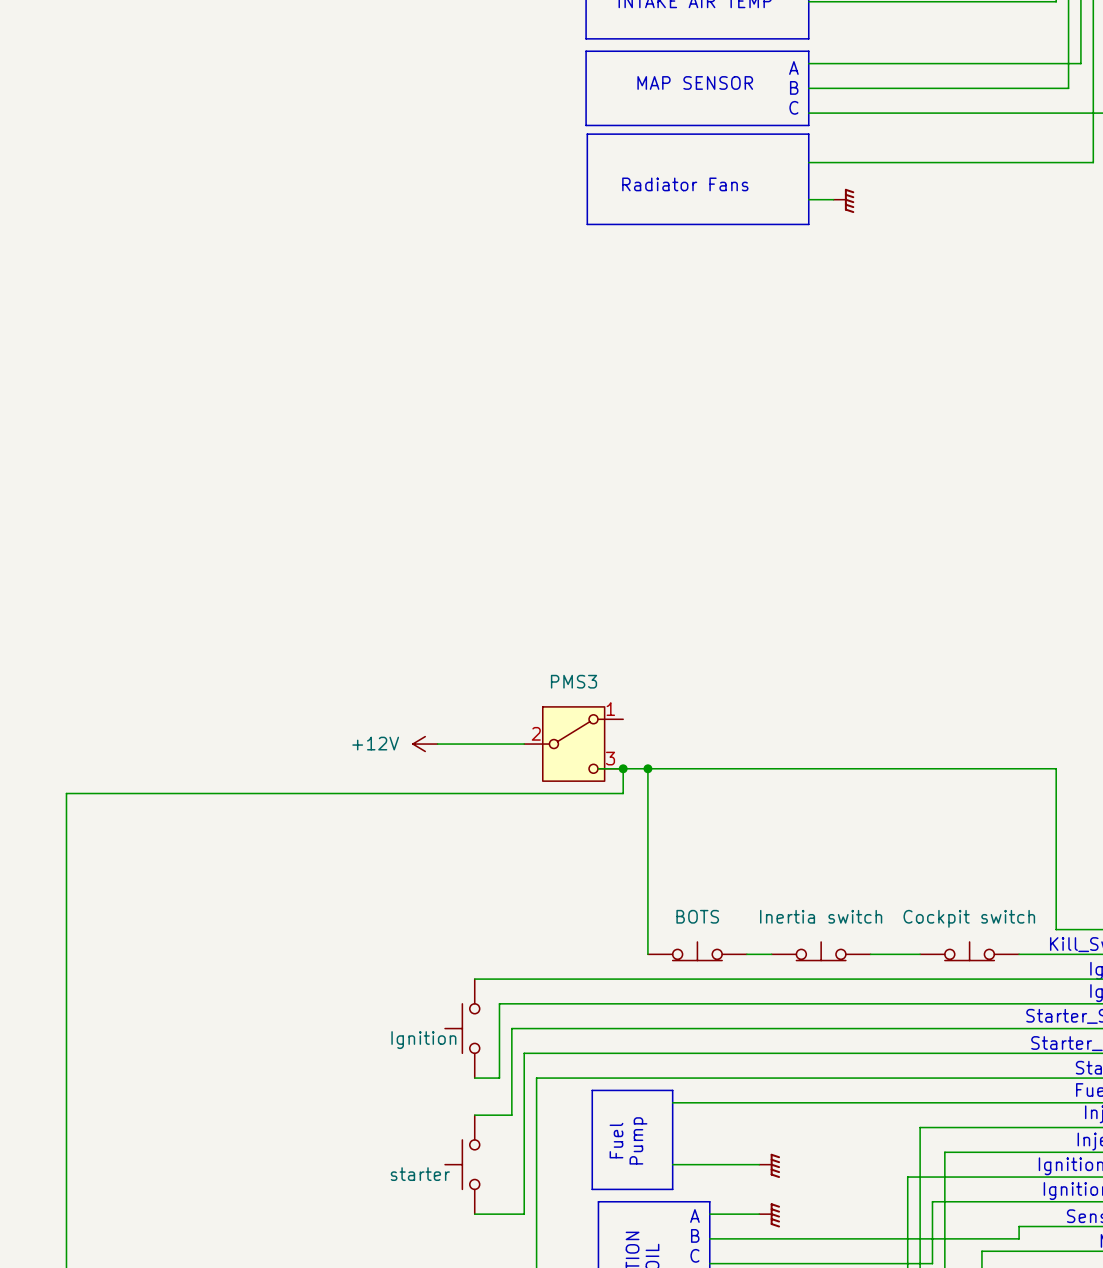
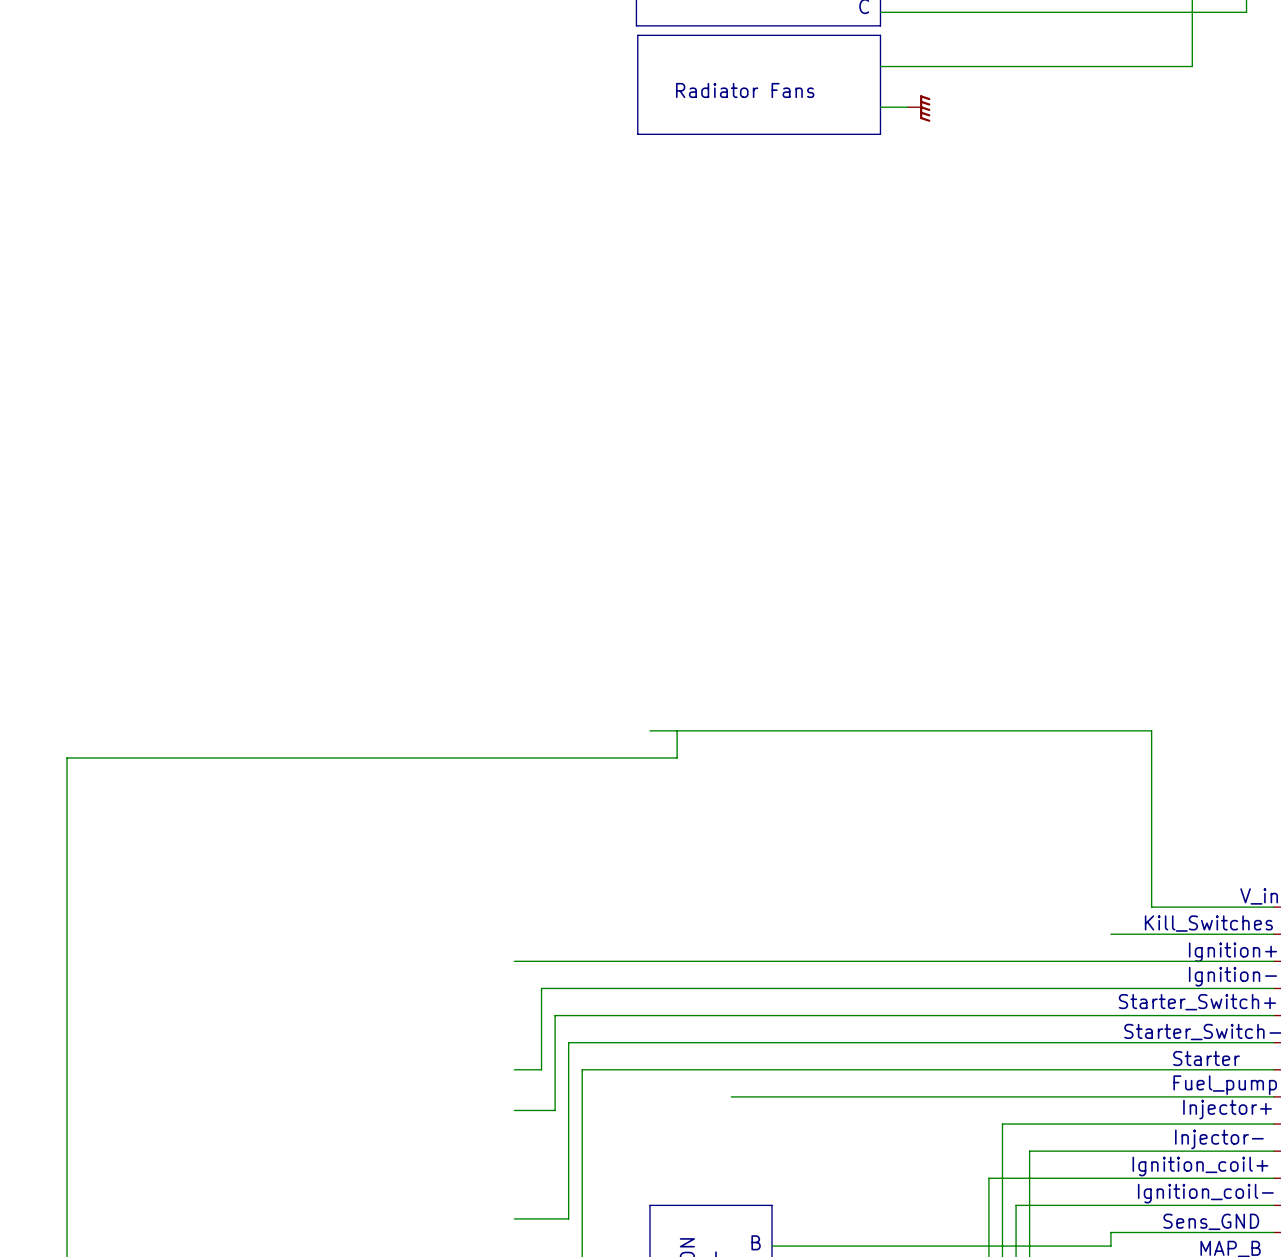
power symbol: +12V (425, 744) -> none
wire: (437, 744) (524, 744) -> none
PMS3: (573, 744) -> none
junction: (623, 768) -> none
wire: (647, 768) (647, 954) -> none
junction: (647, 768) -> none
part: BOTS (697, 951) -> none
part: Inertia switch (821, 951) -> none
part: Cockpit switch (969, 951) -> none
wire: (746, 954) (771, 954) -> none
wire: (870, 954) (920, 954) -> none
part: Ignition (462, 1028) -> none
line: (592, 1090) (672, 1090) (672, 1189) (592, 1189) (592, 1090) -> none
text: Fuel (616, 1140) -> none
text: Pump (638, 1140) -> none
part: starter (462, 1164) -> none
wire: (672, 1164) (759, 1164) -> none
power symbol: (769, 1165) -> none
wire: (709, 1214) (759, 1214) -> none
power symbol: (769, 1215) -> none
text: A (694, 1216) -> none

